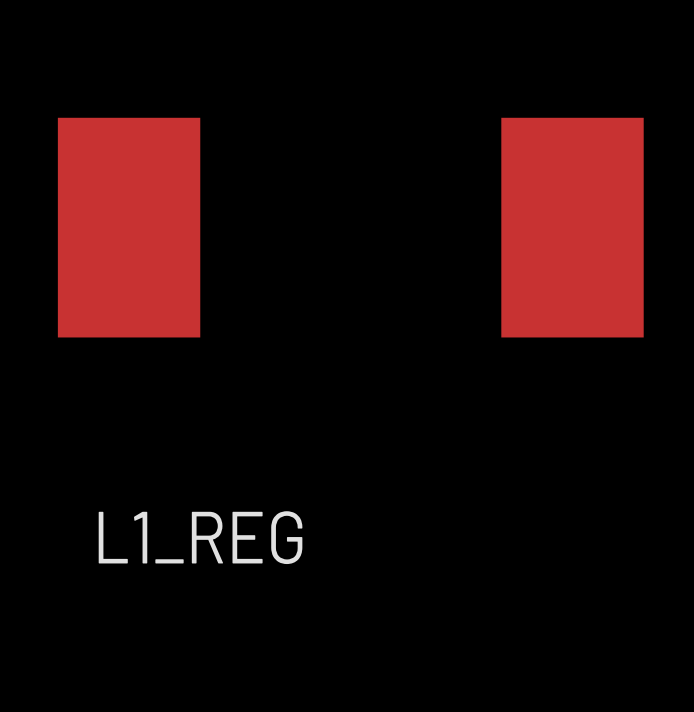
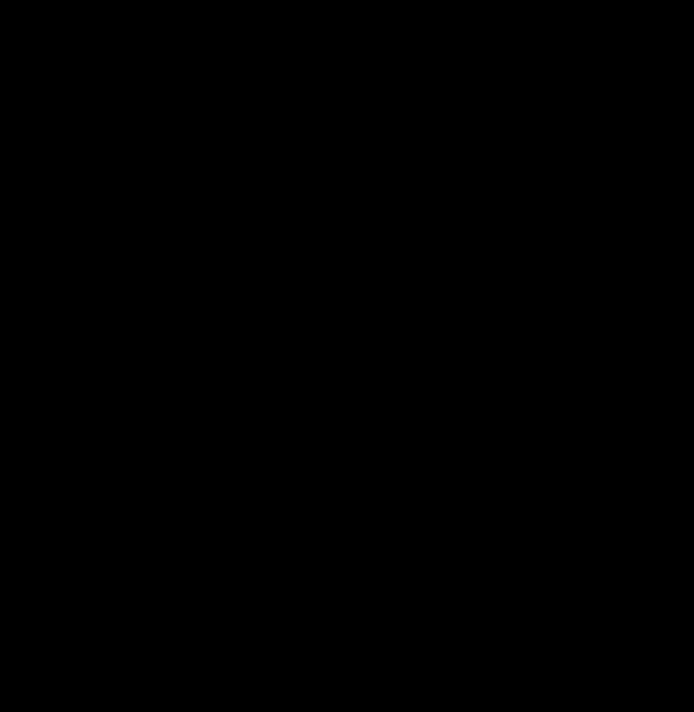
L1_REG: (350, 227) -> none

